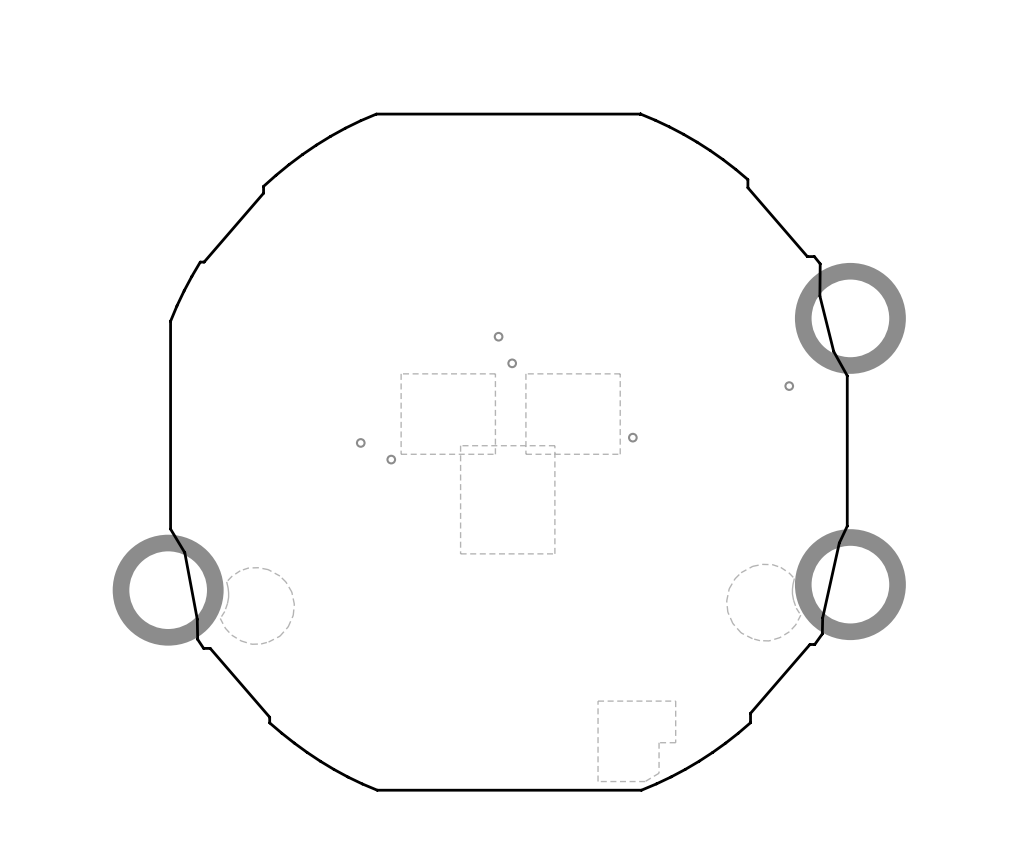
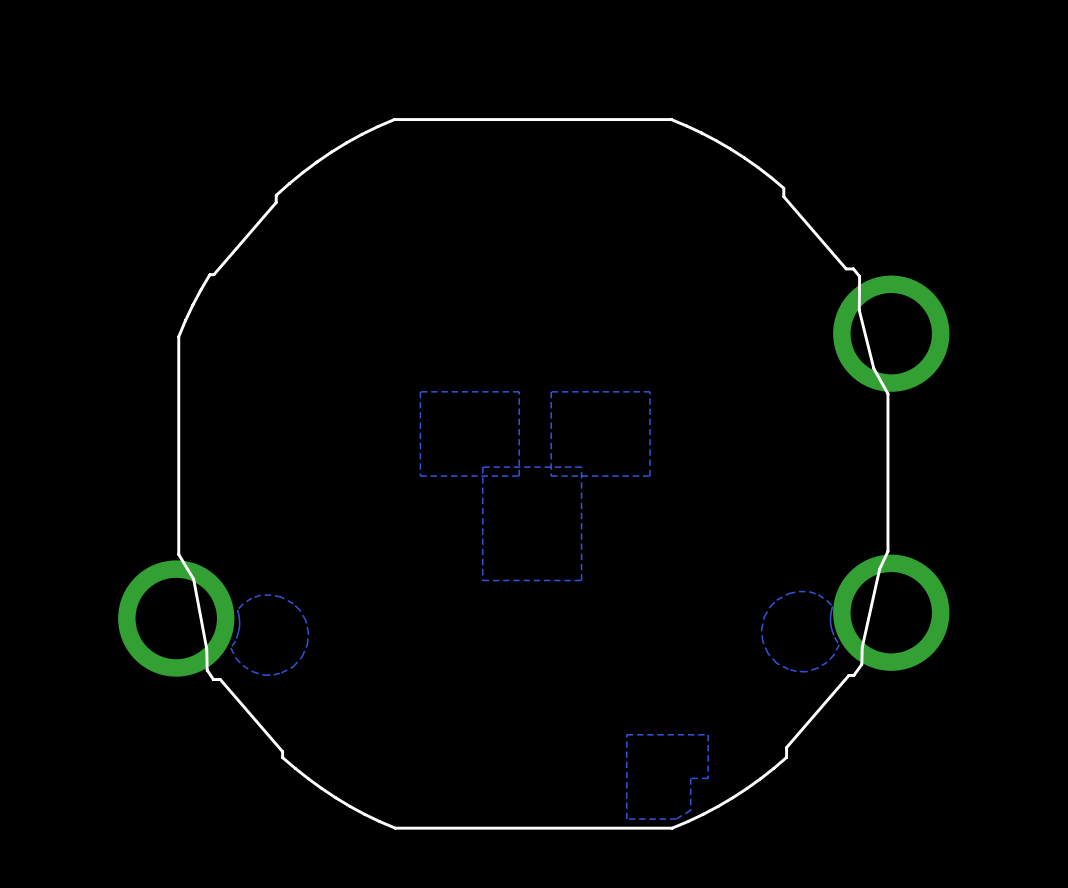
via: (498, 336) -> none
via: (512, 363) -> none
via: (789, 386) -> none
via: (632, 437) -> none
via: (360, 442) -> none
via: (391, 459) -> none

